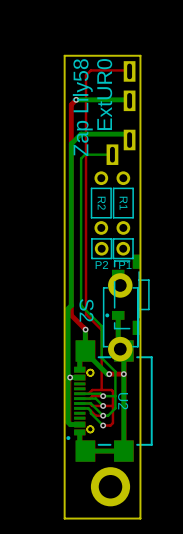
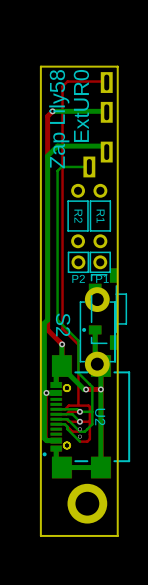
via: none -> (79, 429)
via: (103, 415) -> none
via: none -> (79, 436)
via: (103, 425) -> none

